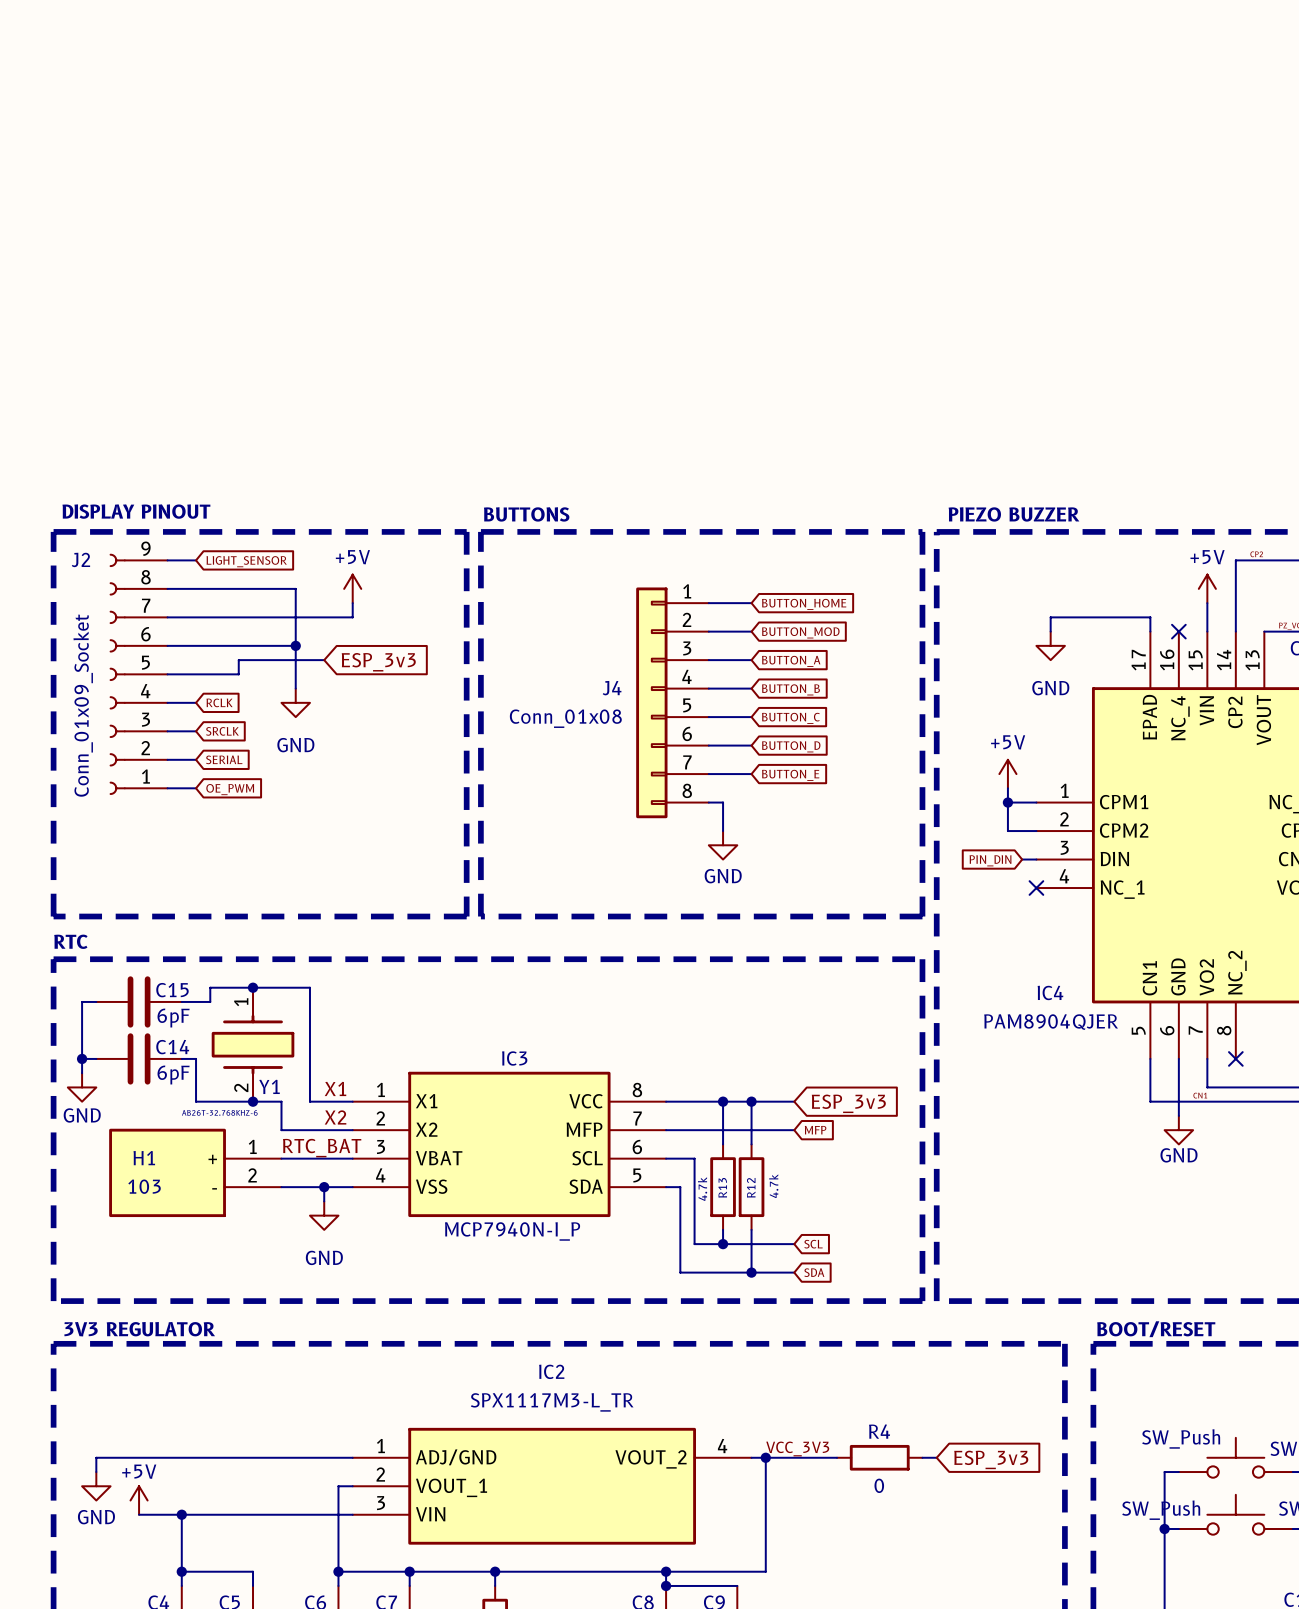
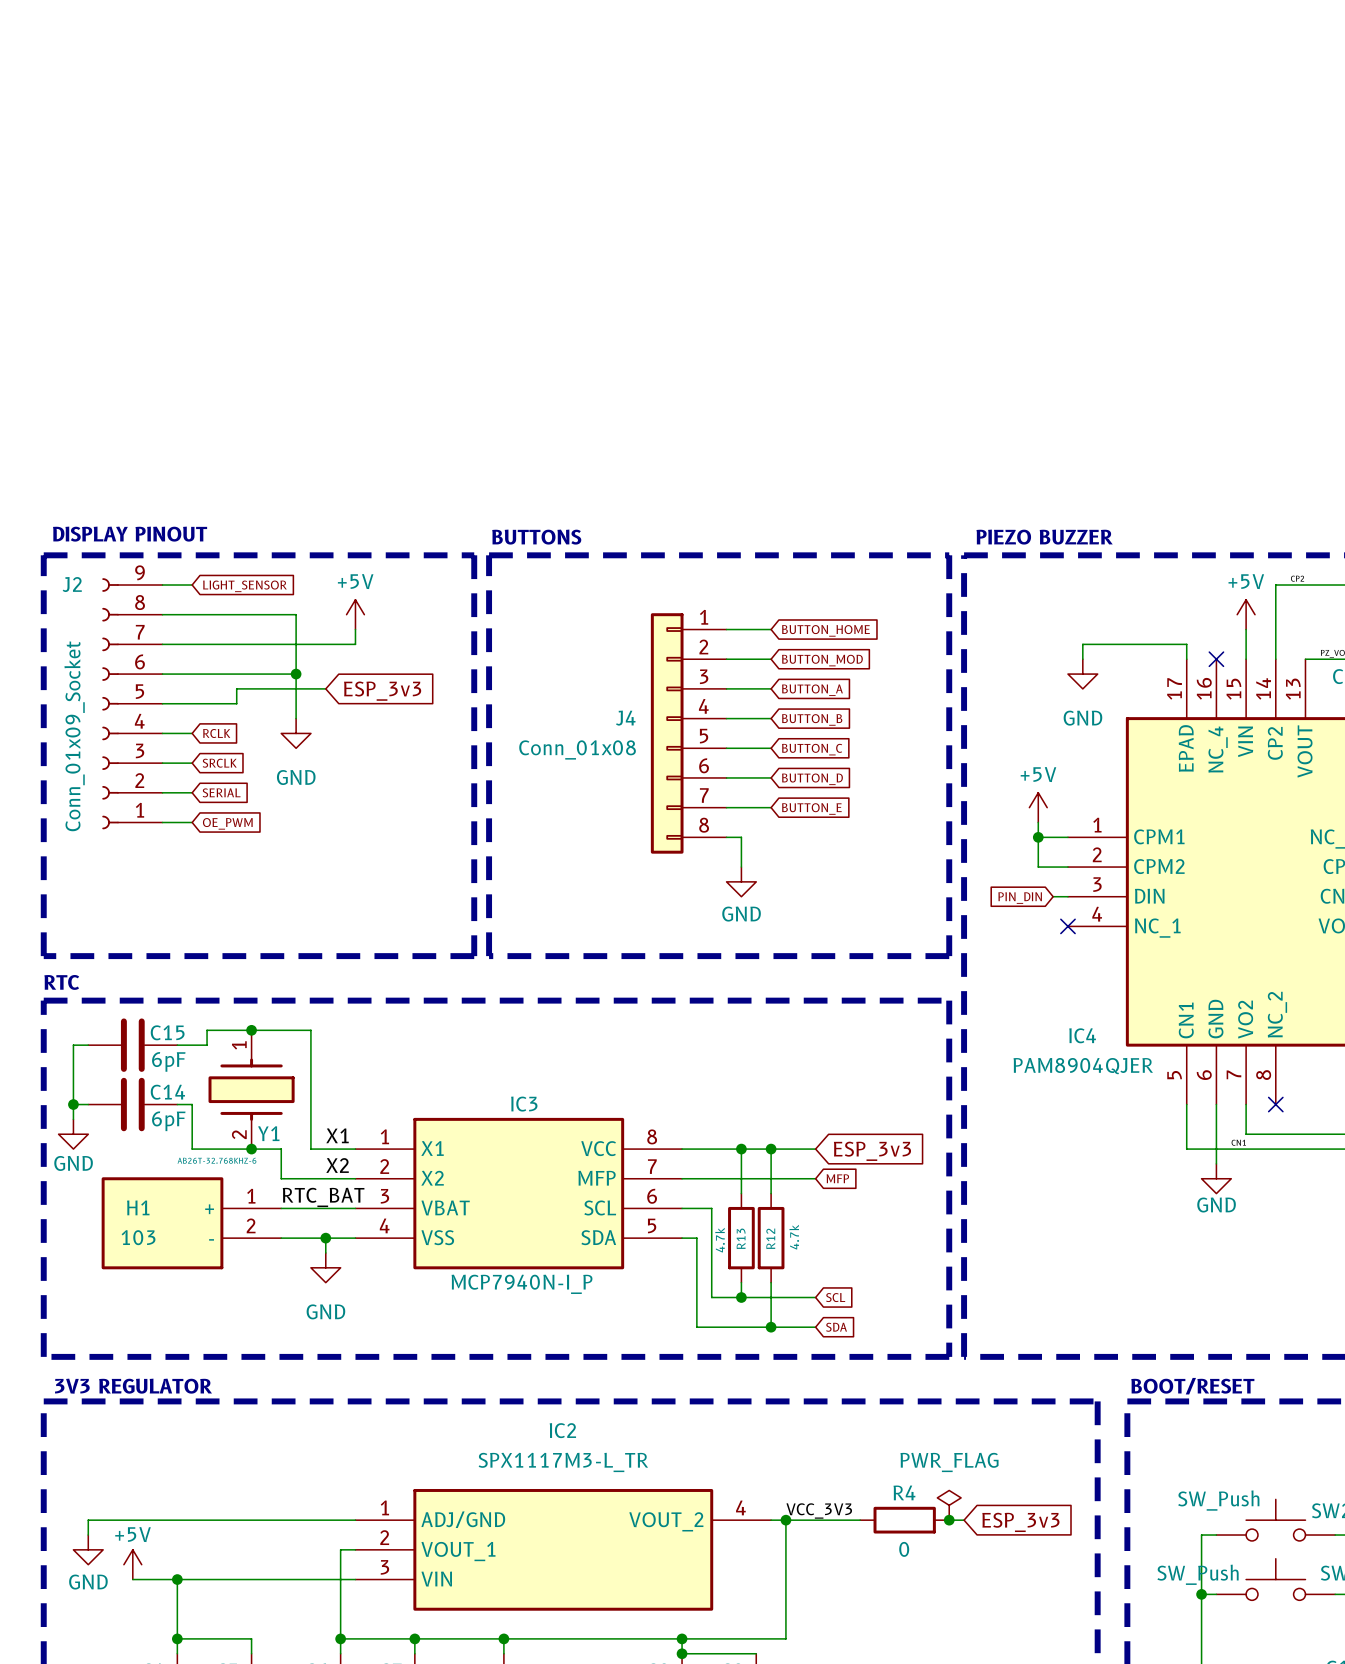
power symbol: none -> PWR_FLAG (949, 1505)
junction: none -> (949, 1520)

